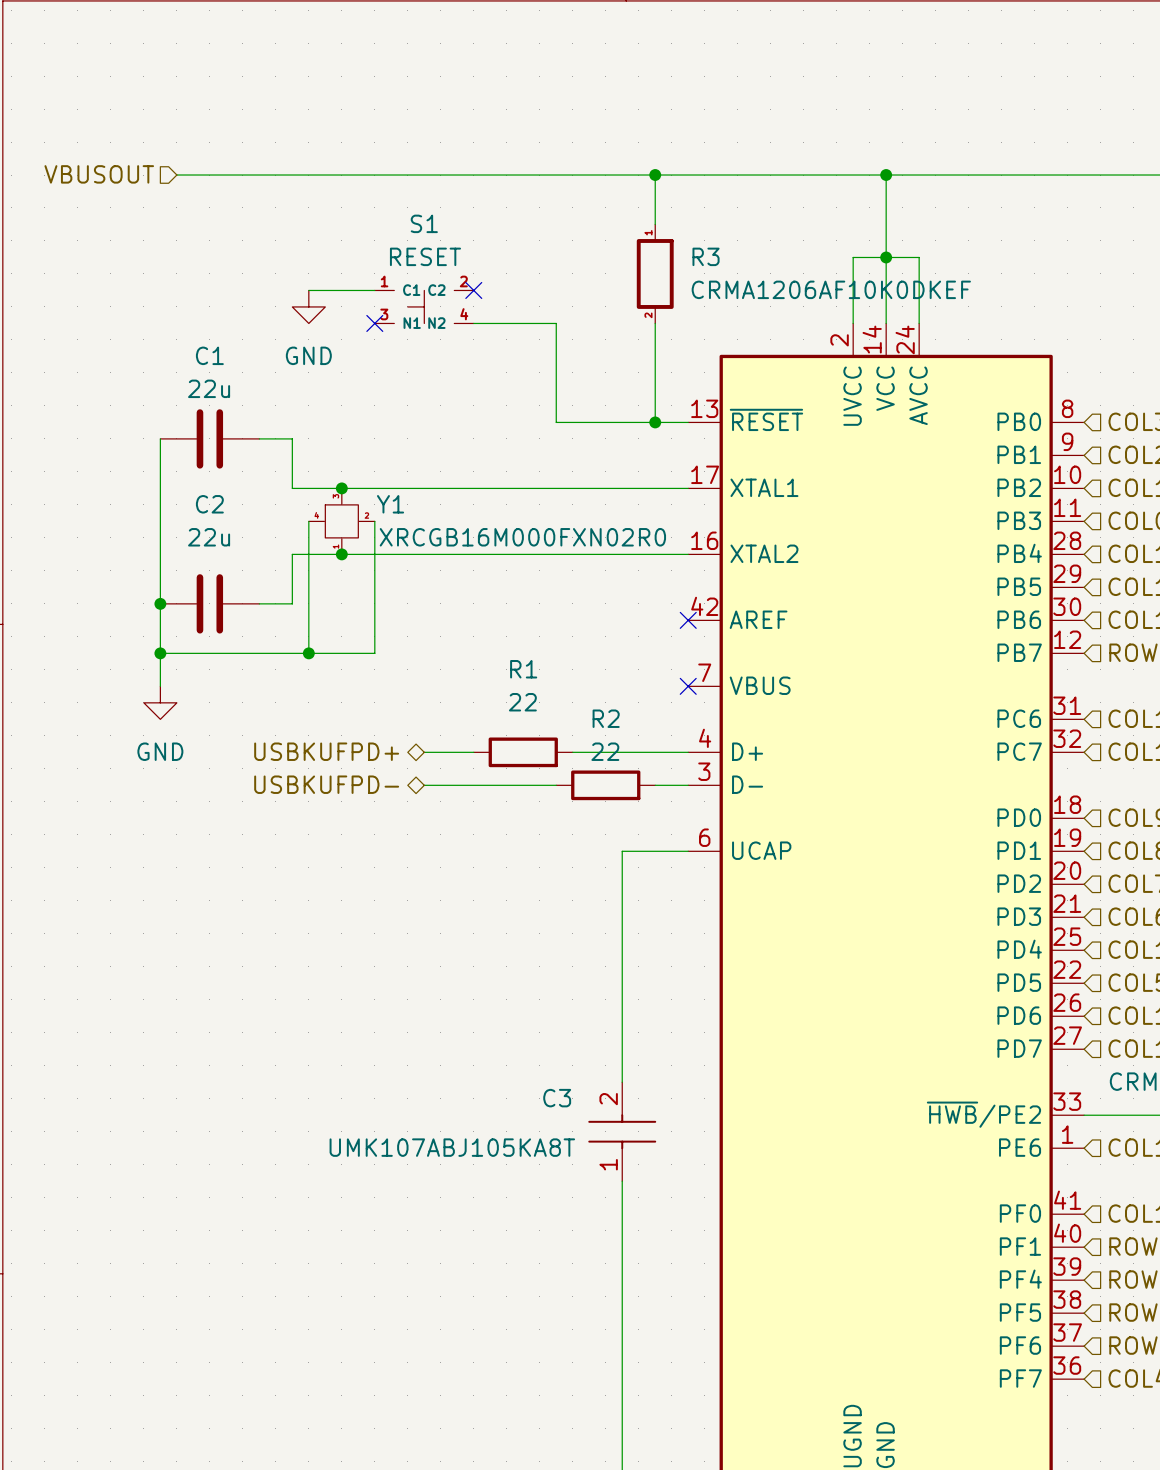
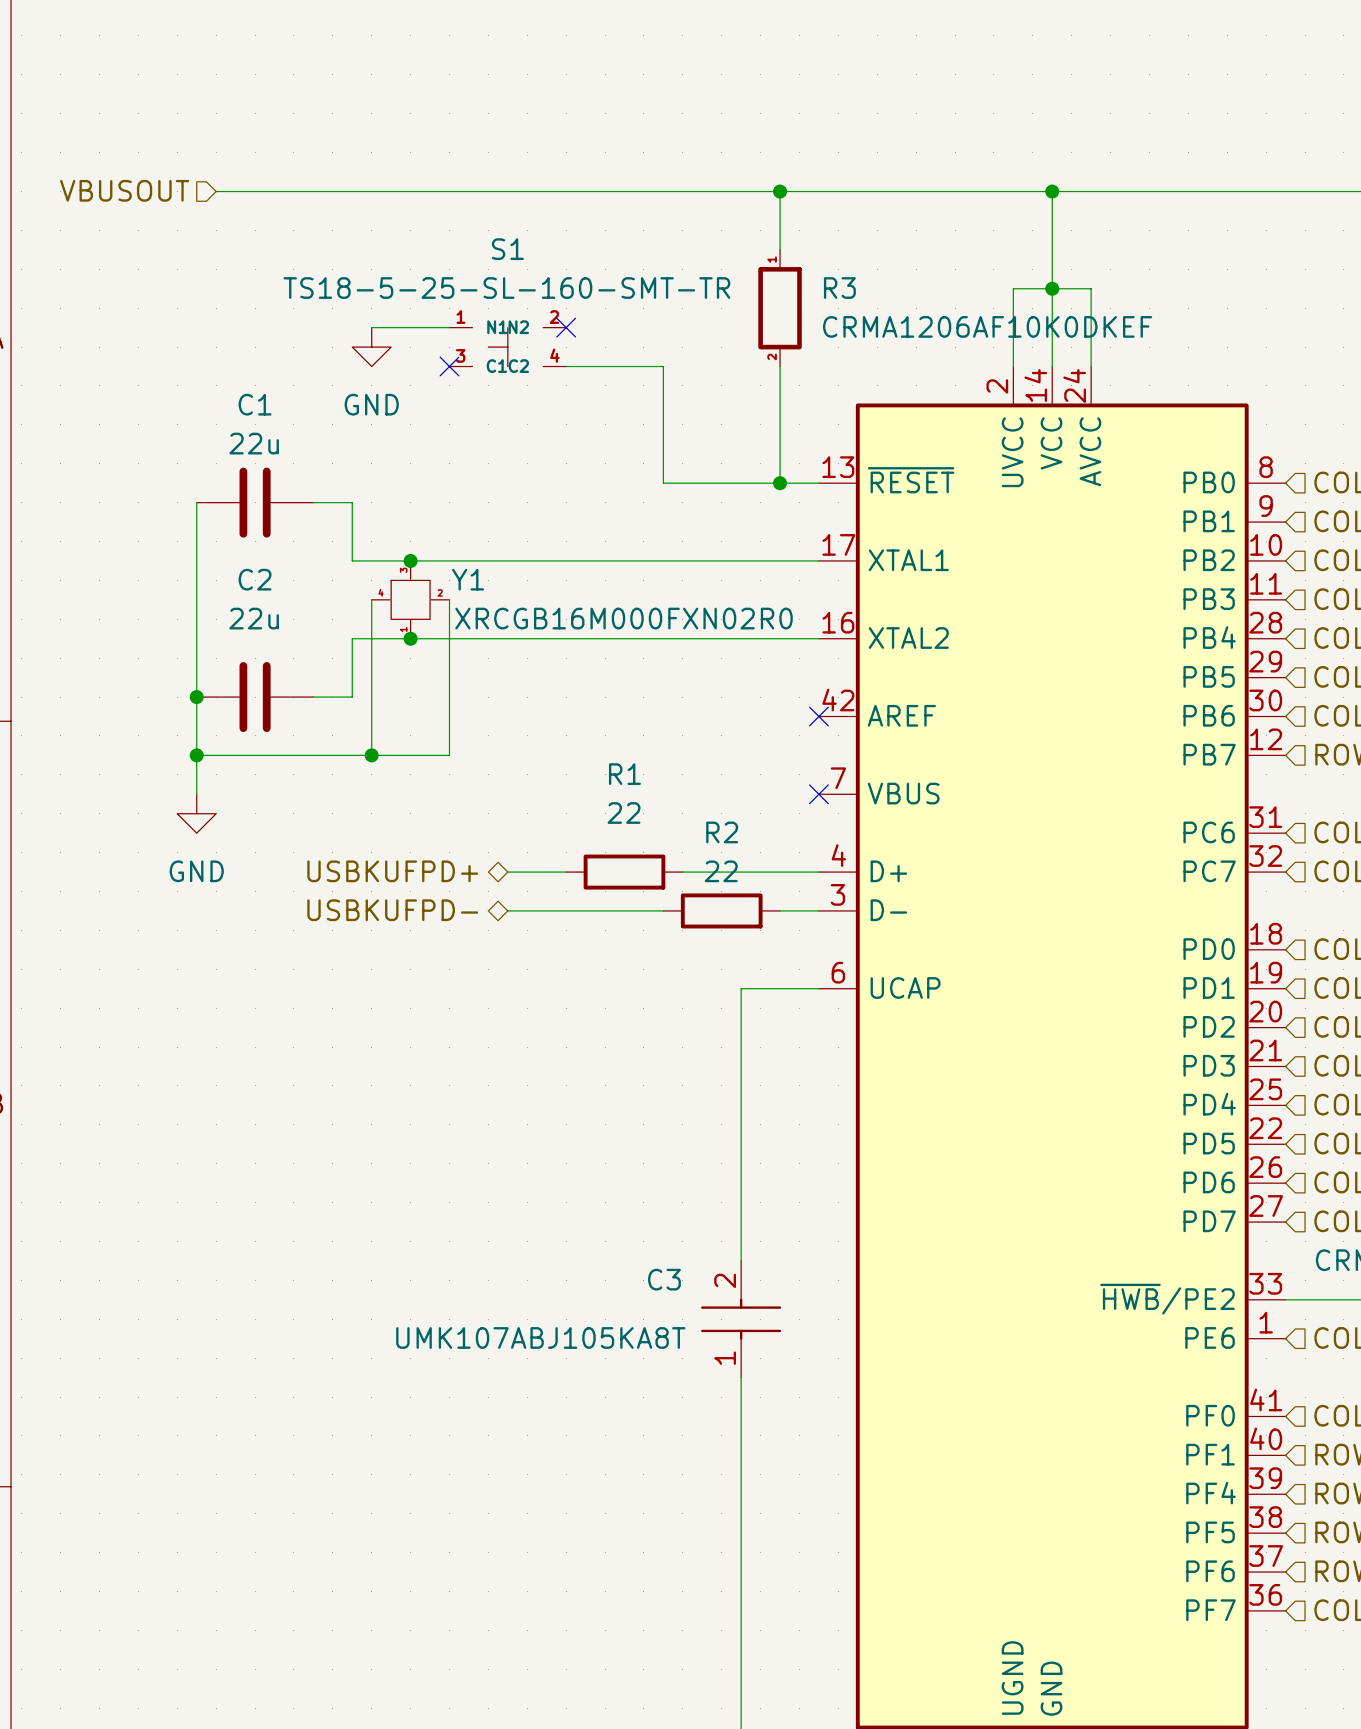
S1 value: RESET (425, 256) -> TS18-5-25-SL-160-SMT-TR (506, 288)
S1 pin name: C1 (411, 290) -> N1 (497, 327)
S1 pin name: C2 (436, 290) -> N2 (518, 327)
S1 pin name: N1 (412, 323) -> C1 (496, 366)
S1 pin name: N2 (436, 323) -> C2 (518, 366)

